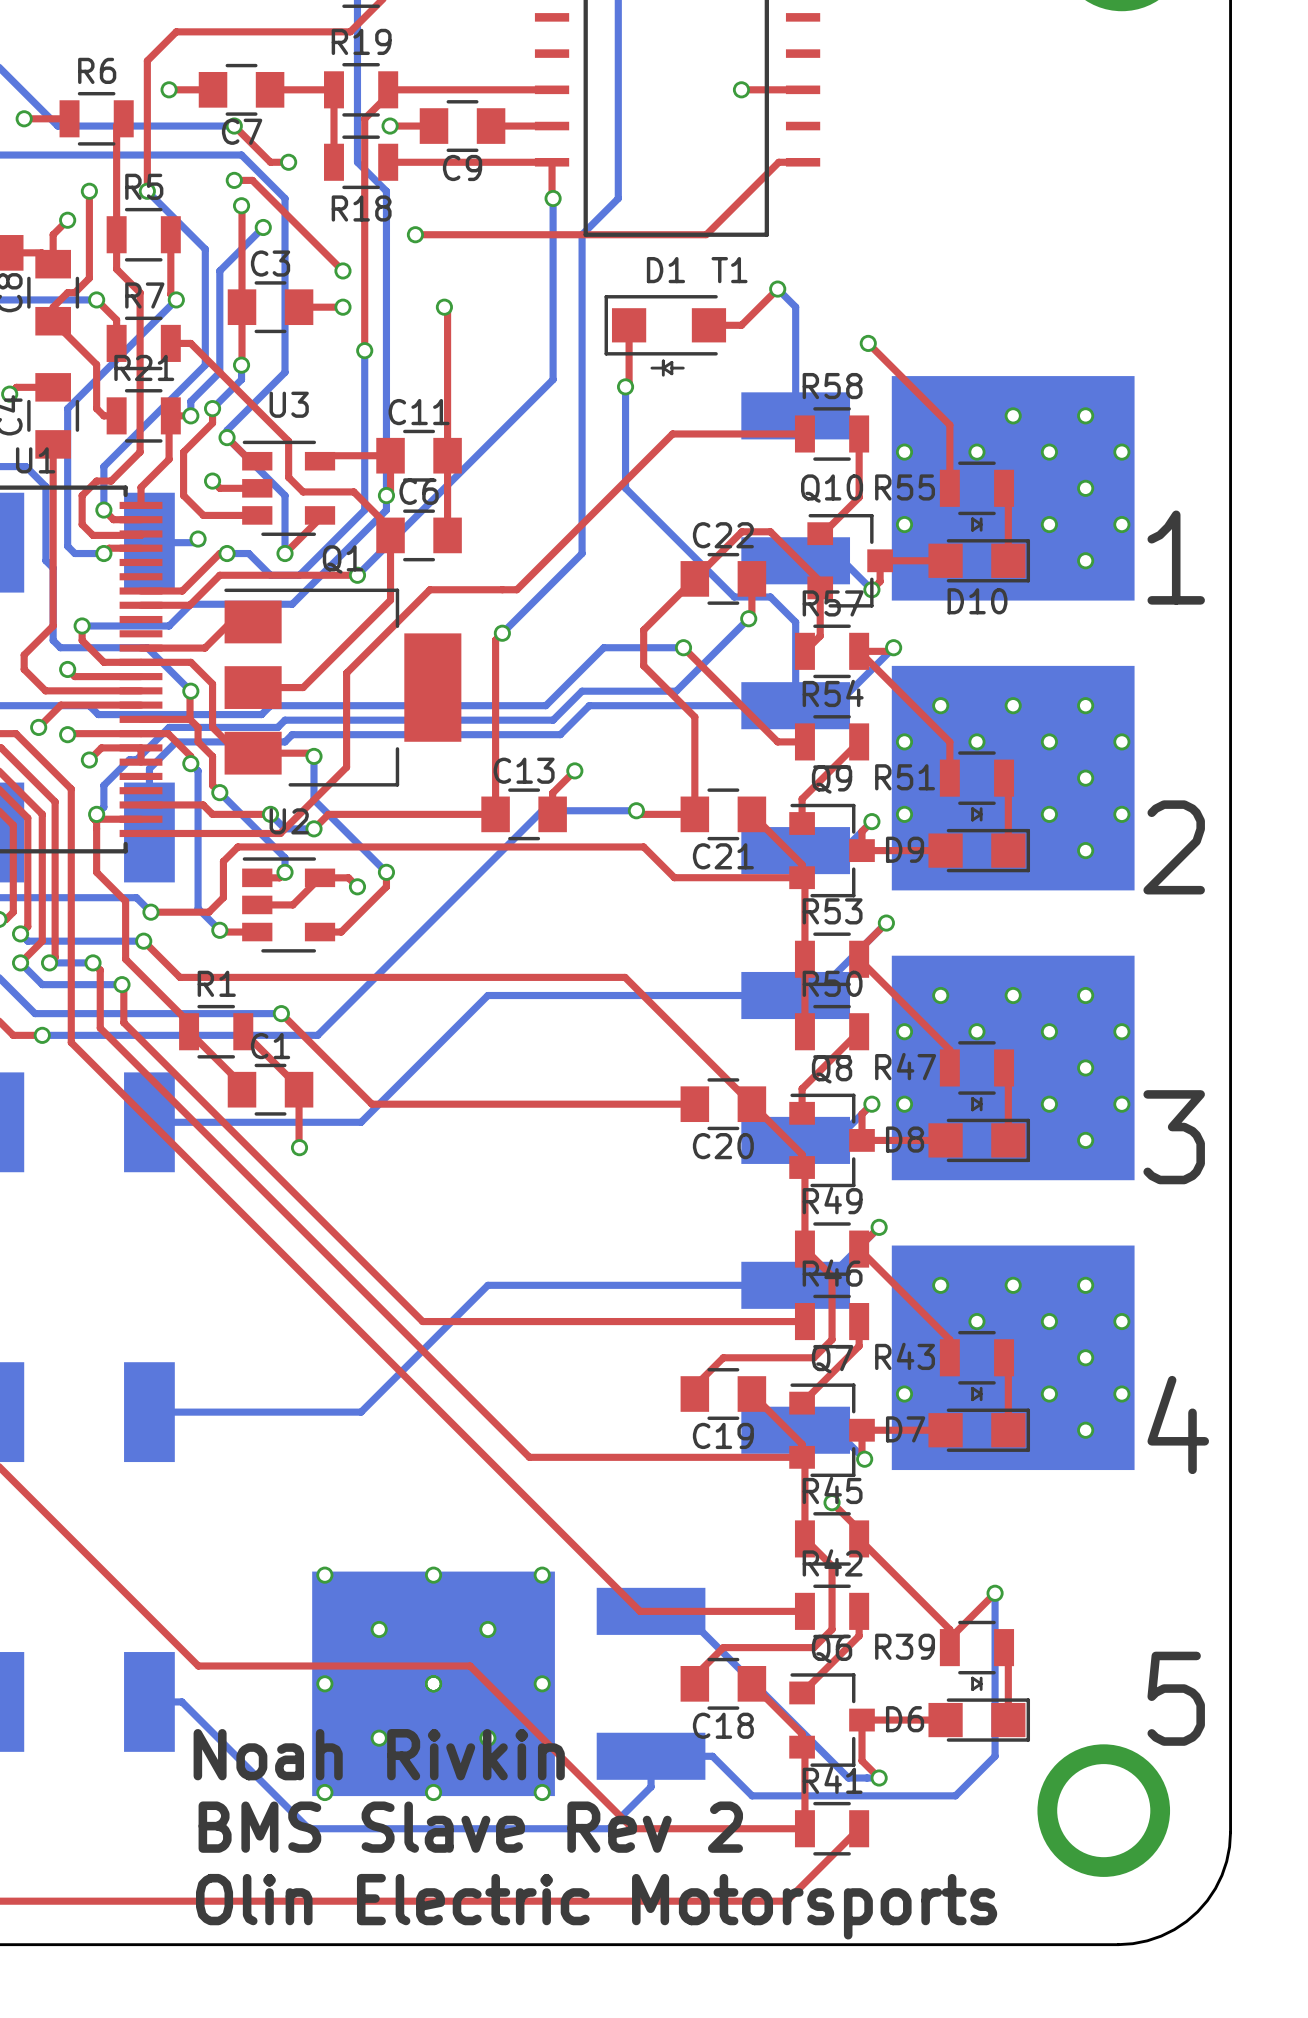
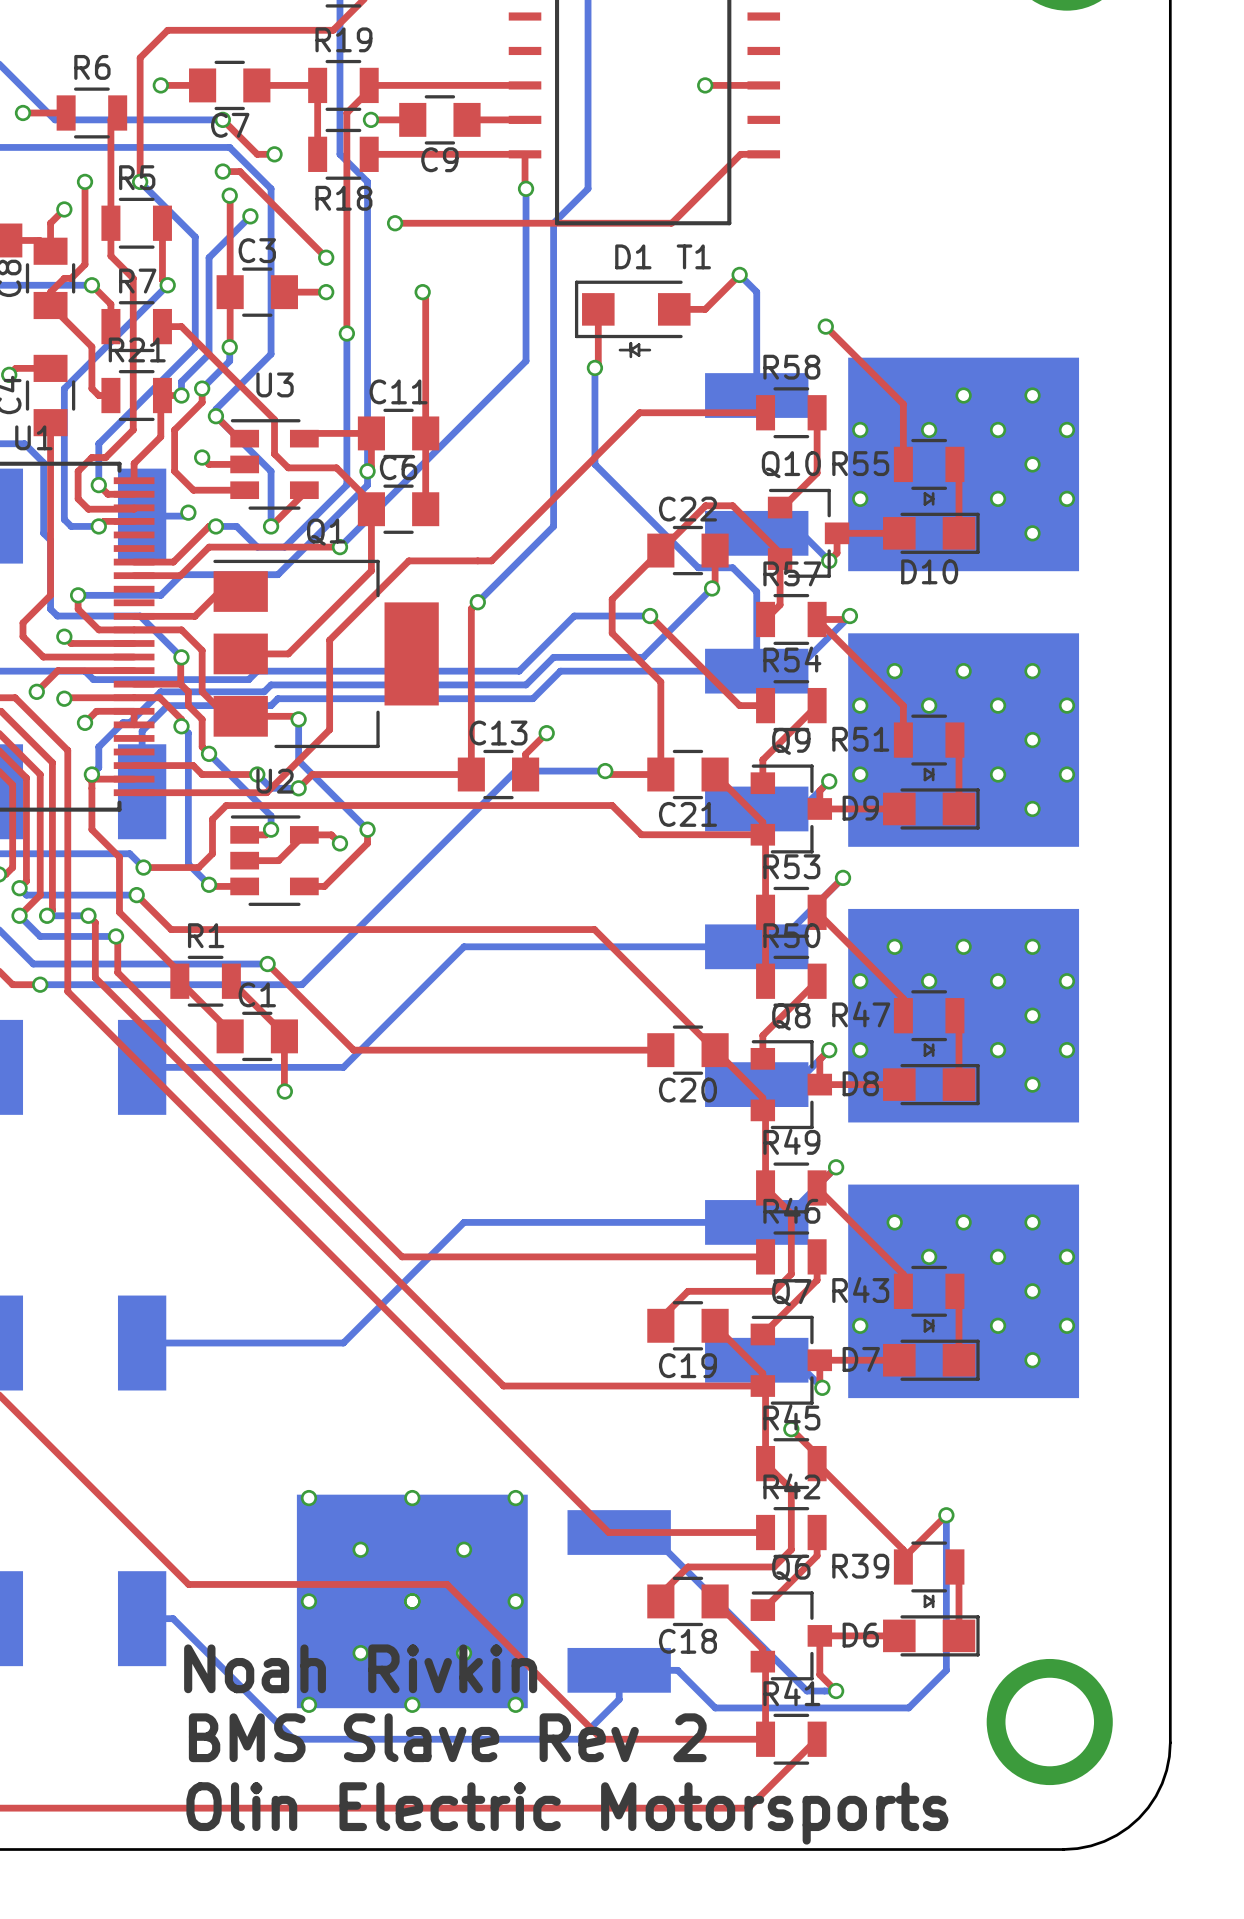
text: 1 (1176, 557) -> none
text: 2 (1174, 847) -> none
text: 3 (1174, 1137) -> none
text: 4 (1178, 1425) -> none
text: 5 (1176, 1698) -> none

